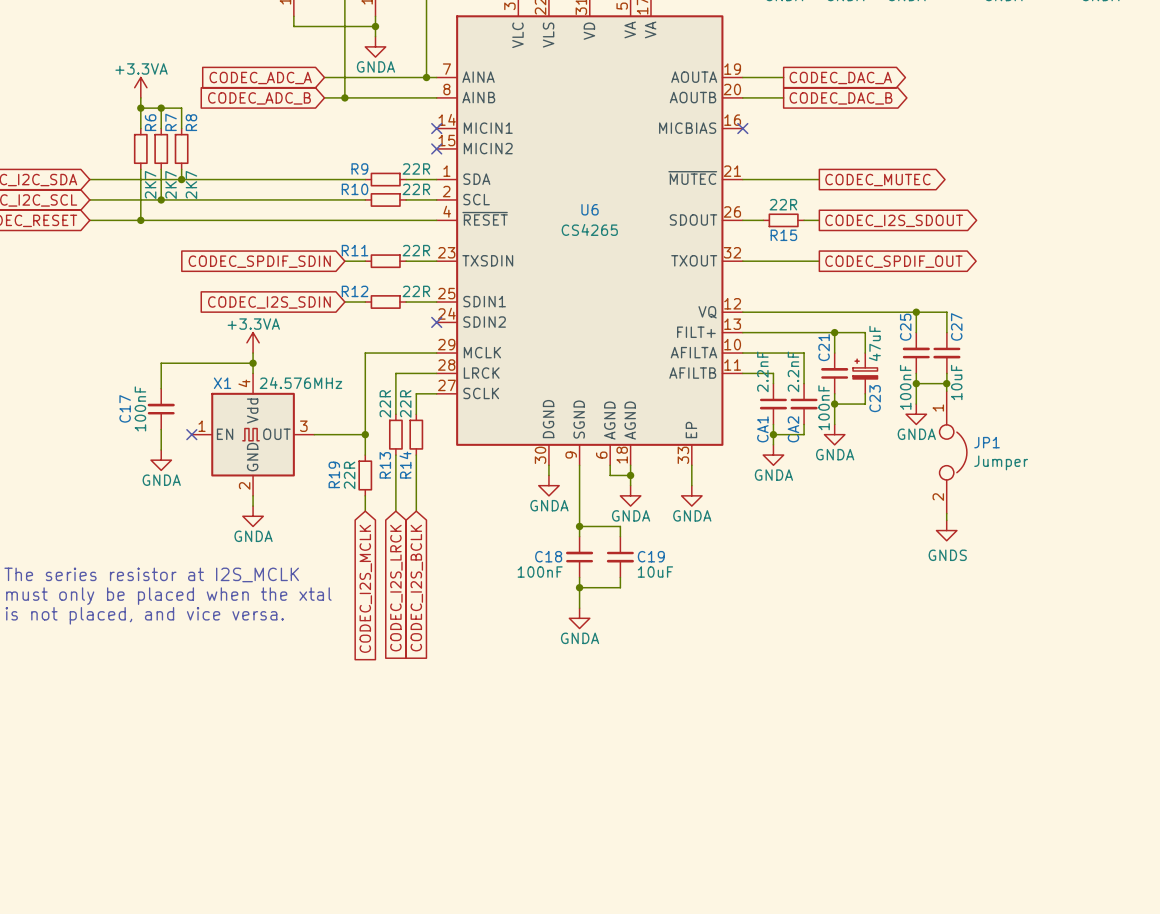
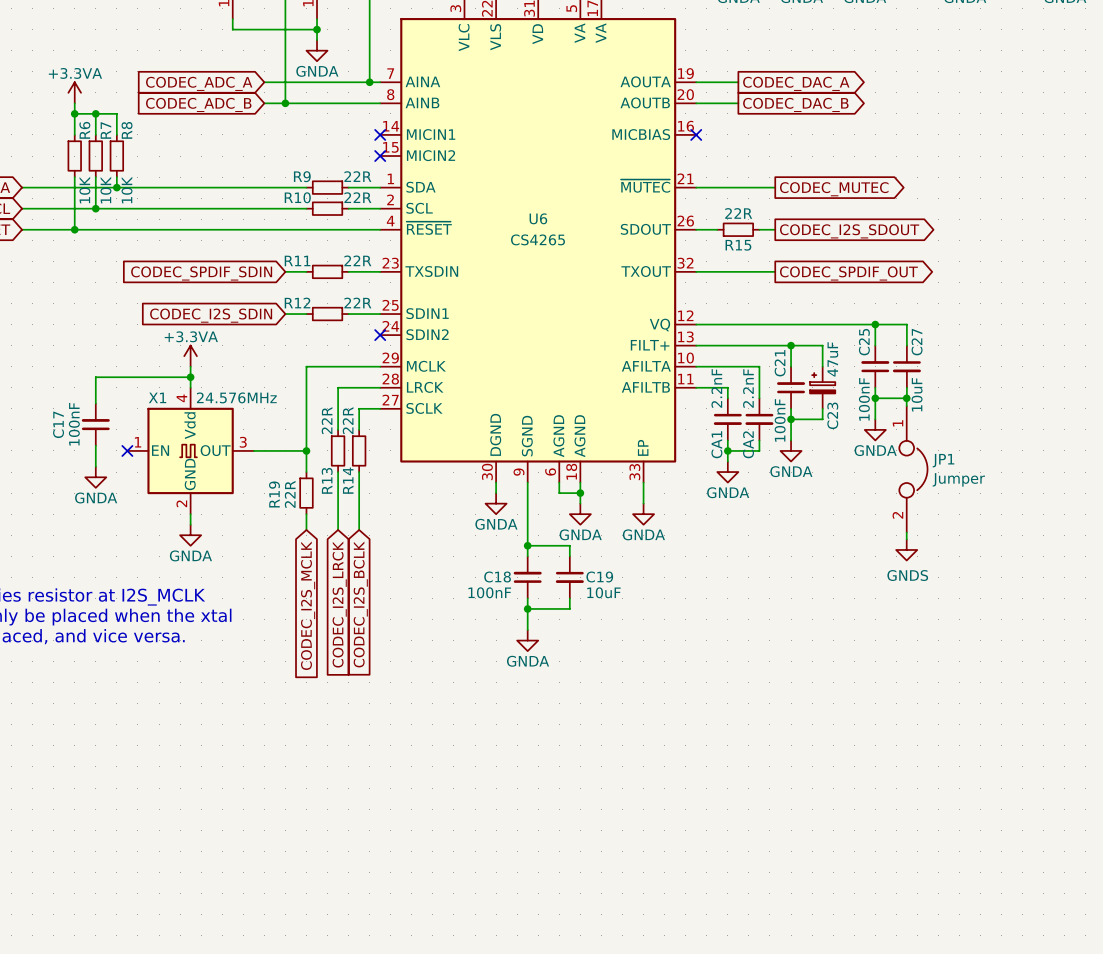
R6 value: 2K7 (150, 184) -> 10K (84, 190)
R7 value: 2K7 (171, 184) -> 10K (105, 190)
R8 value: 2K7 (191, 184) -> 10K (127, 190)

